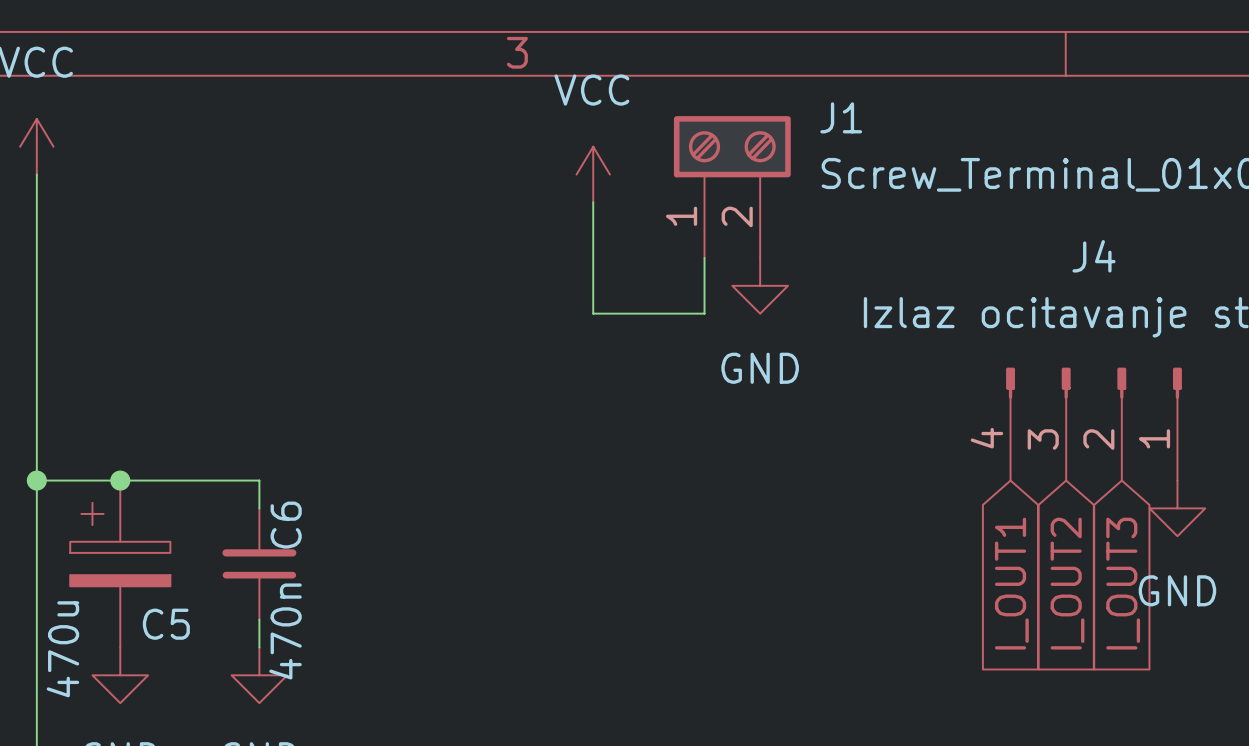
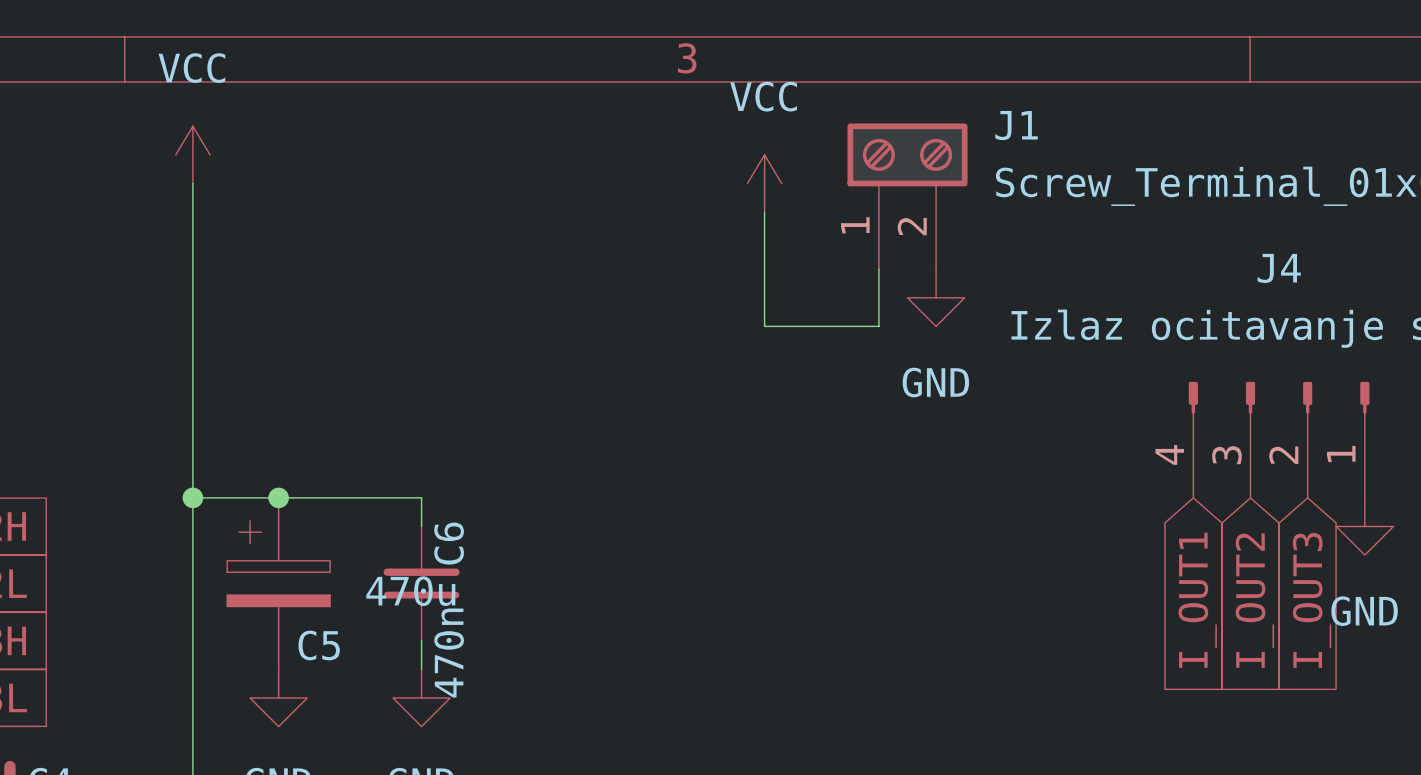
C5 value rotation: 0° (62, 649) -> 90° clockwise (410, 591)
C5 value position: 470u (62, 649) -> 470u (410, 591)

